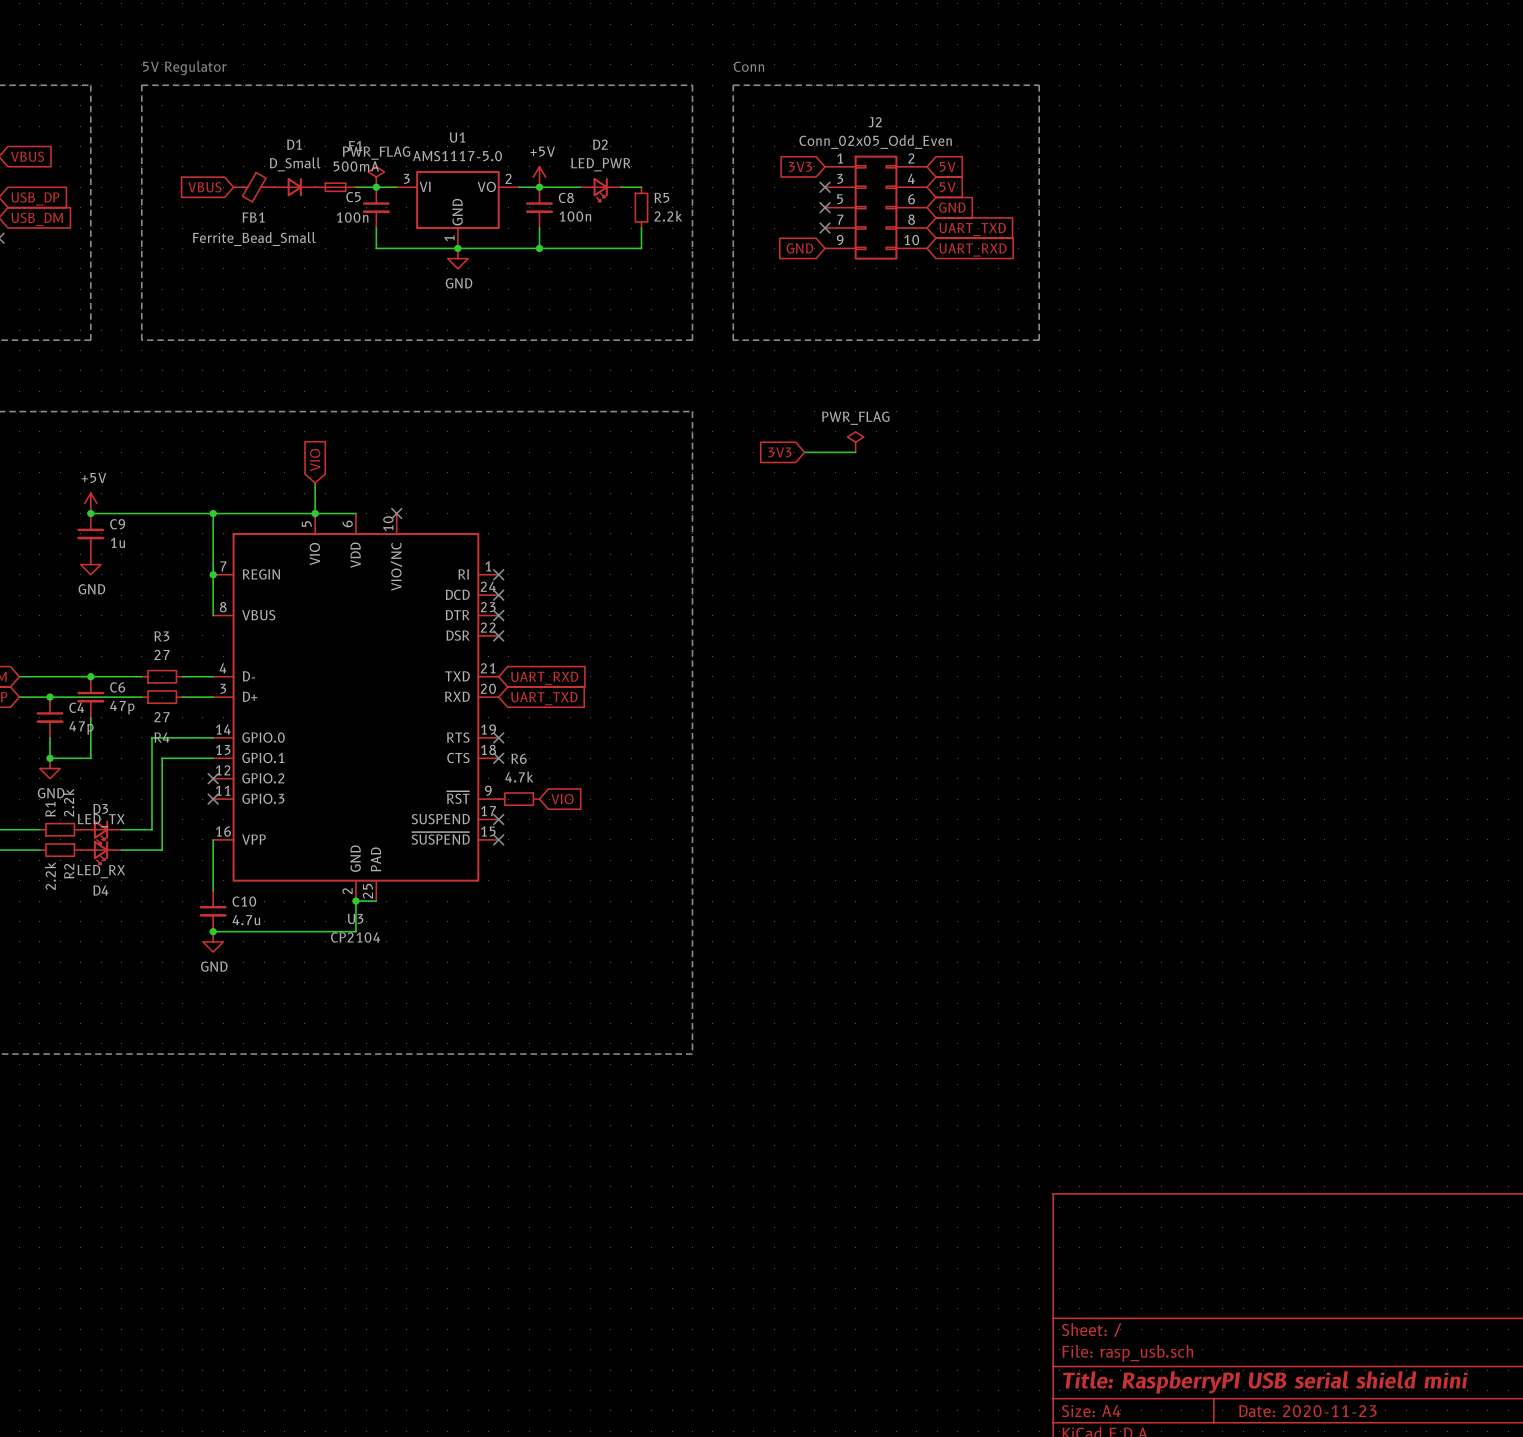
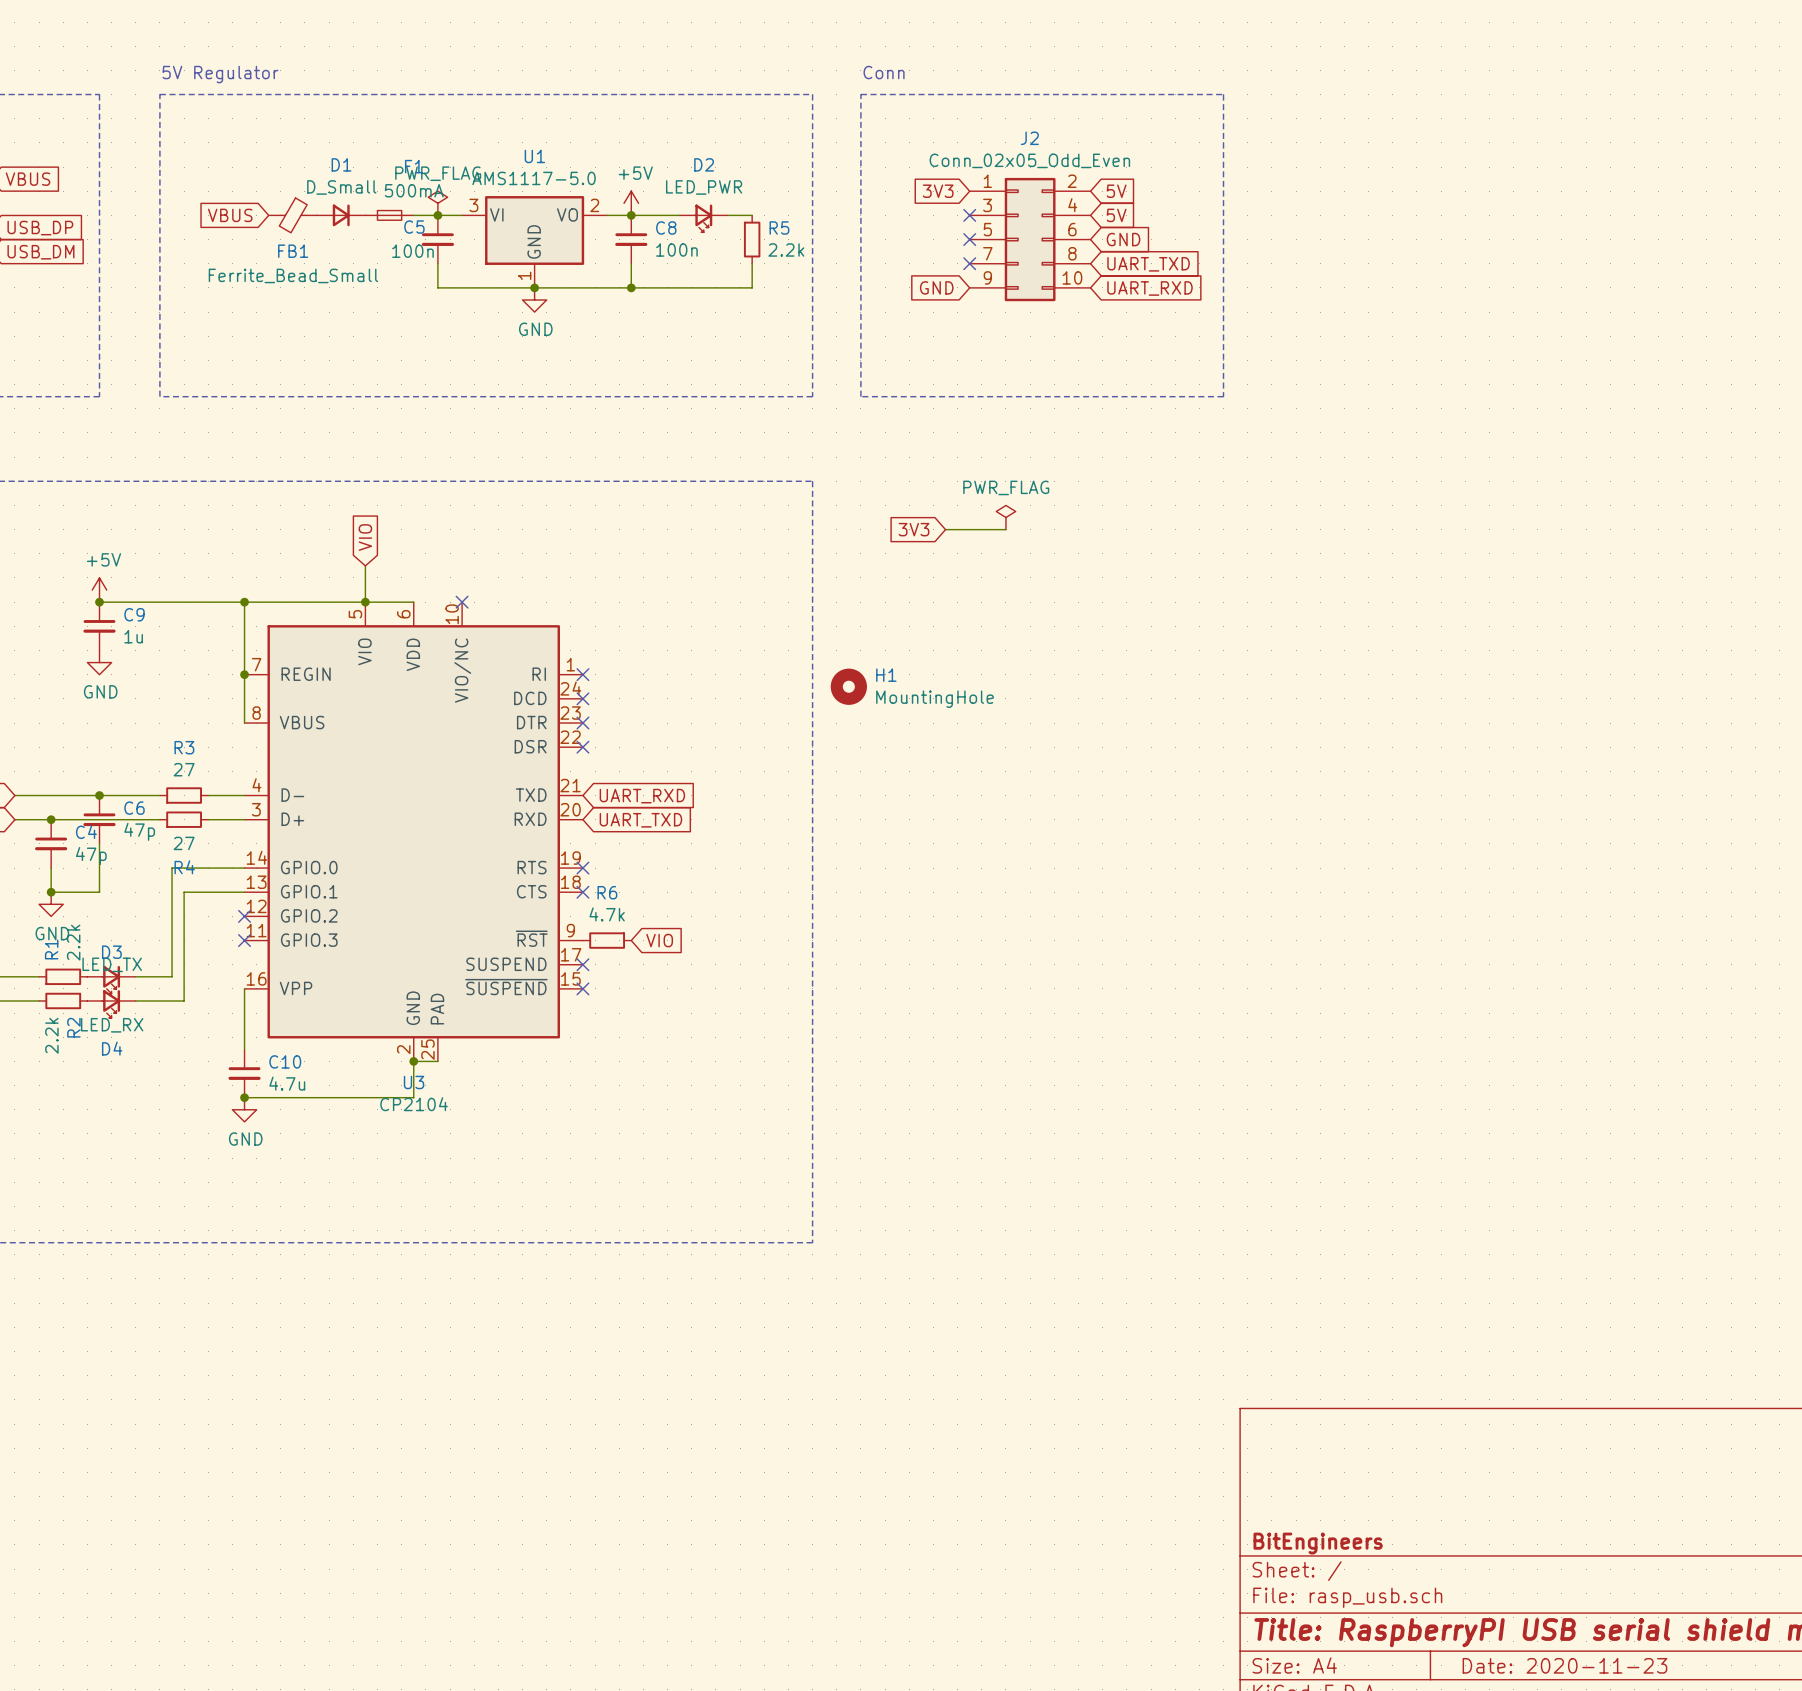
H1: none -> MountingHole (848, 686)
title block: none -> BitEngineers (1318, 1543)

